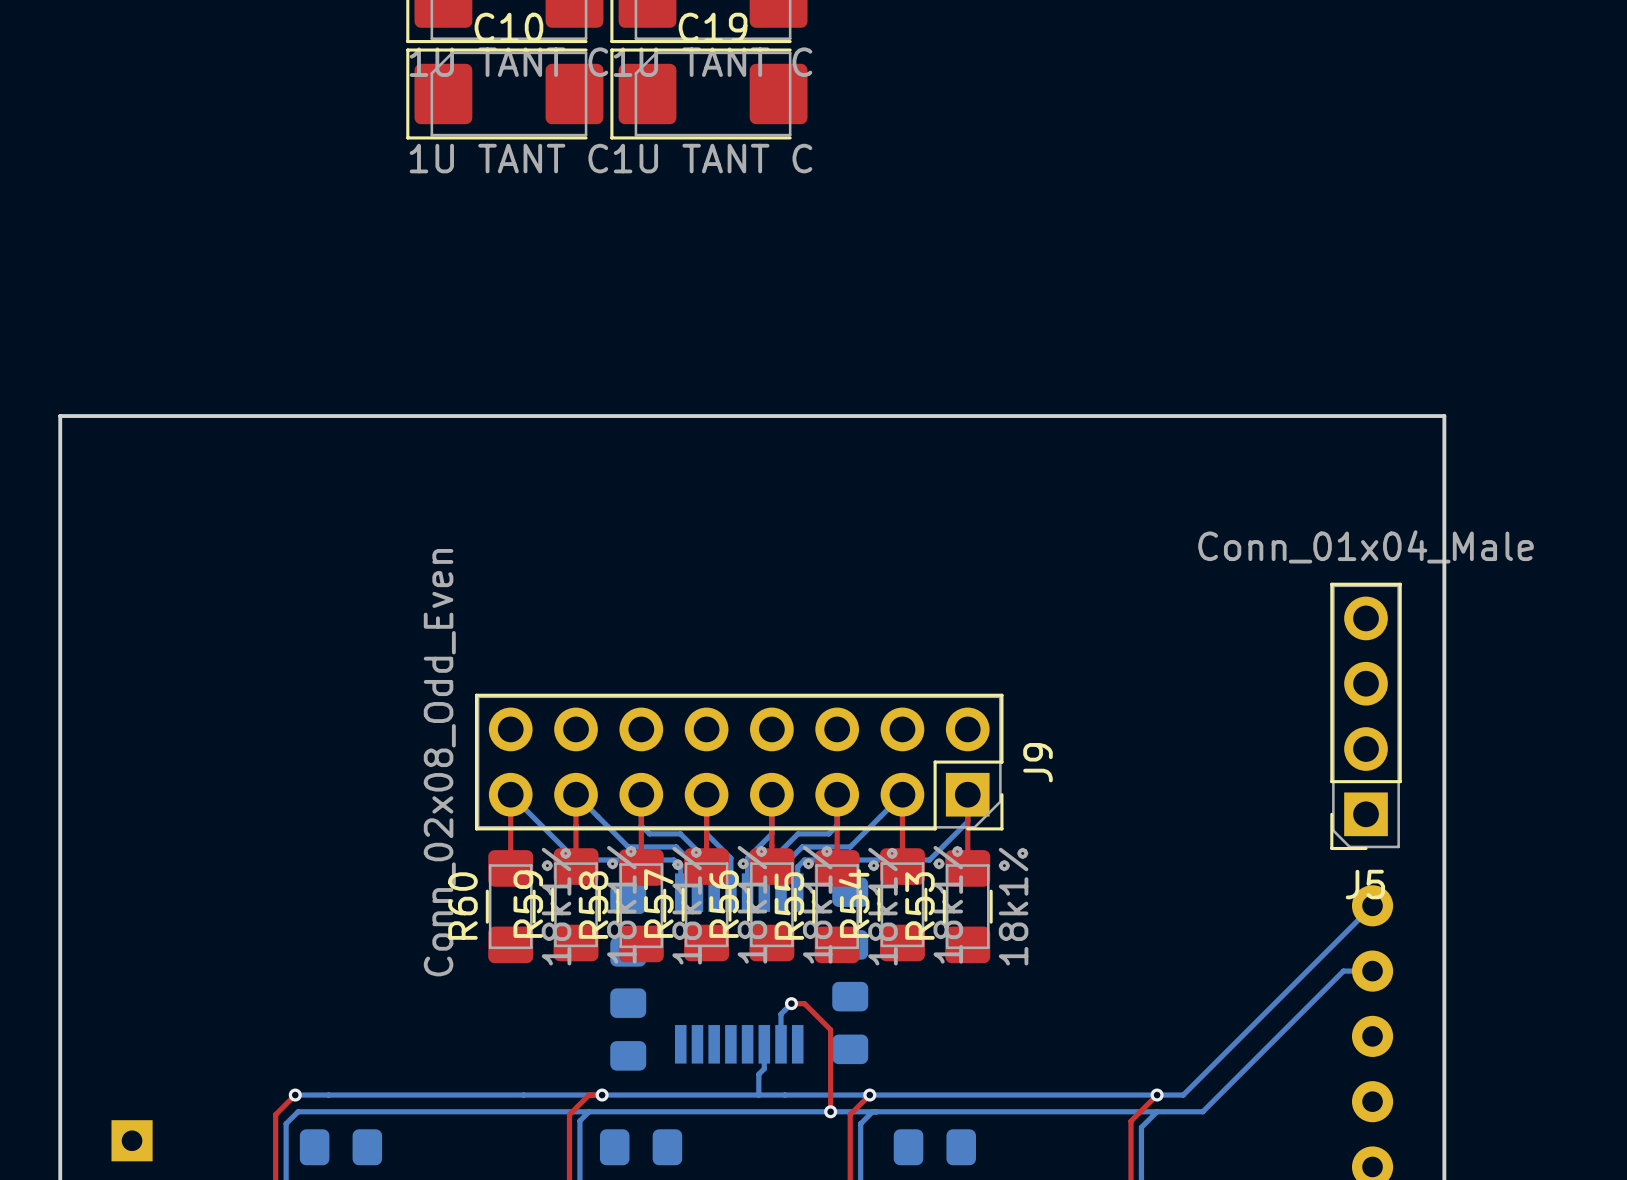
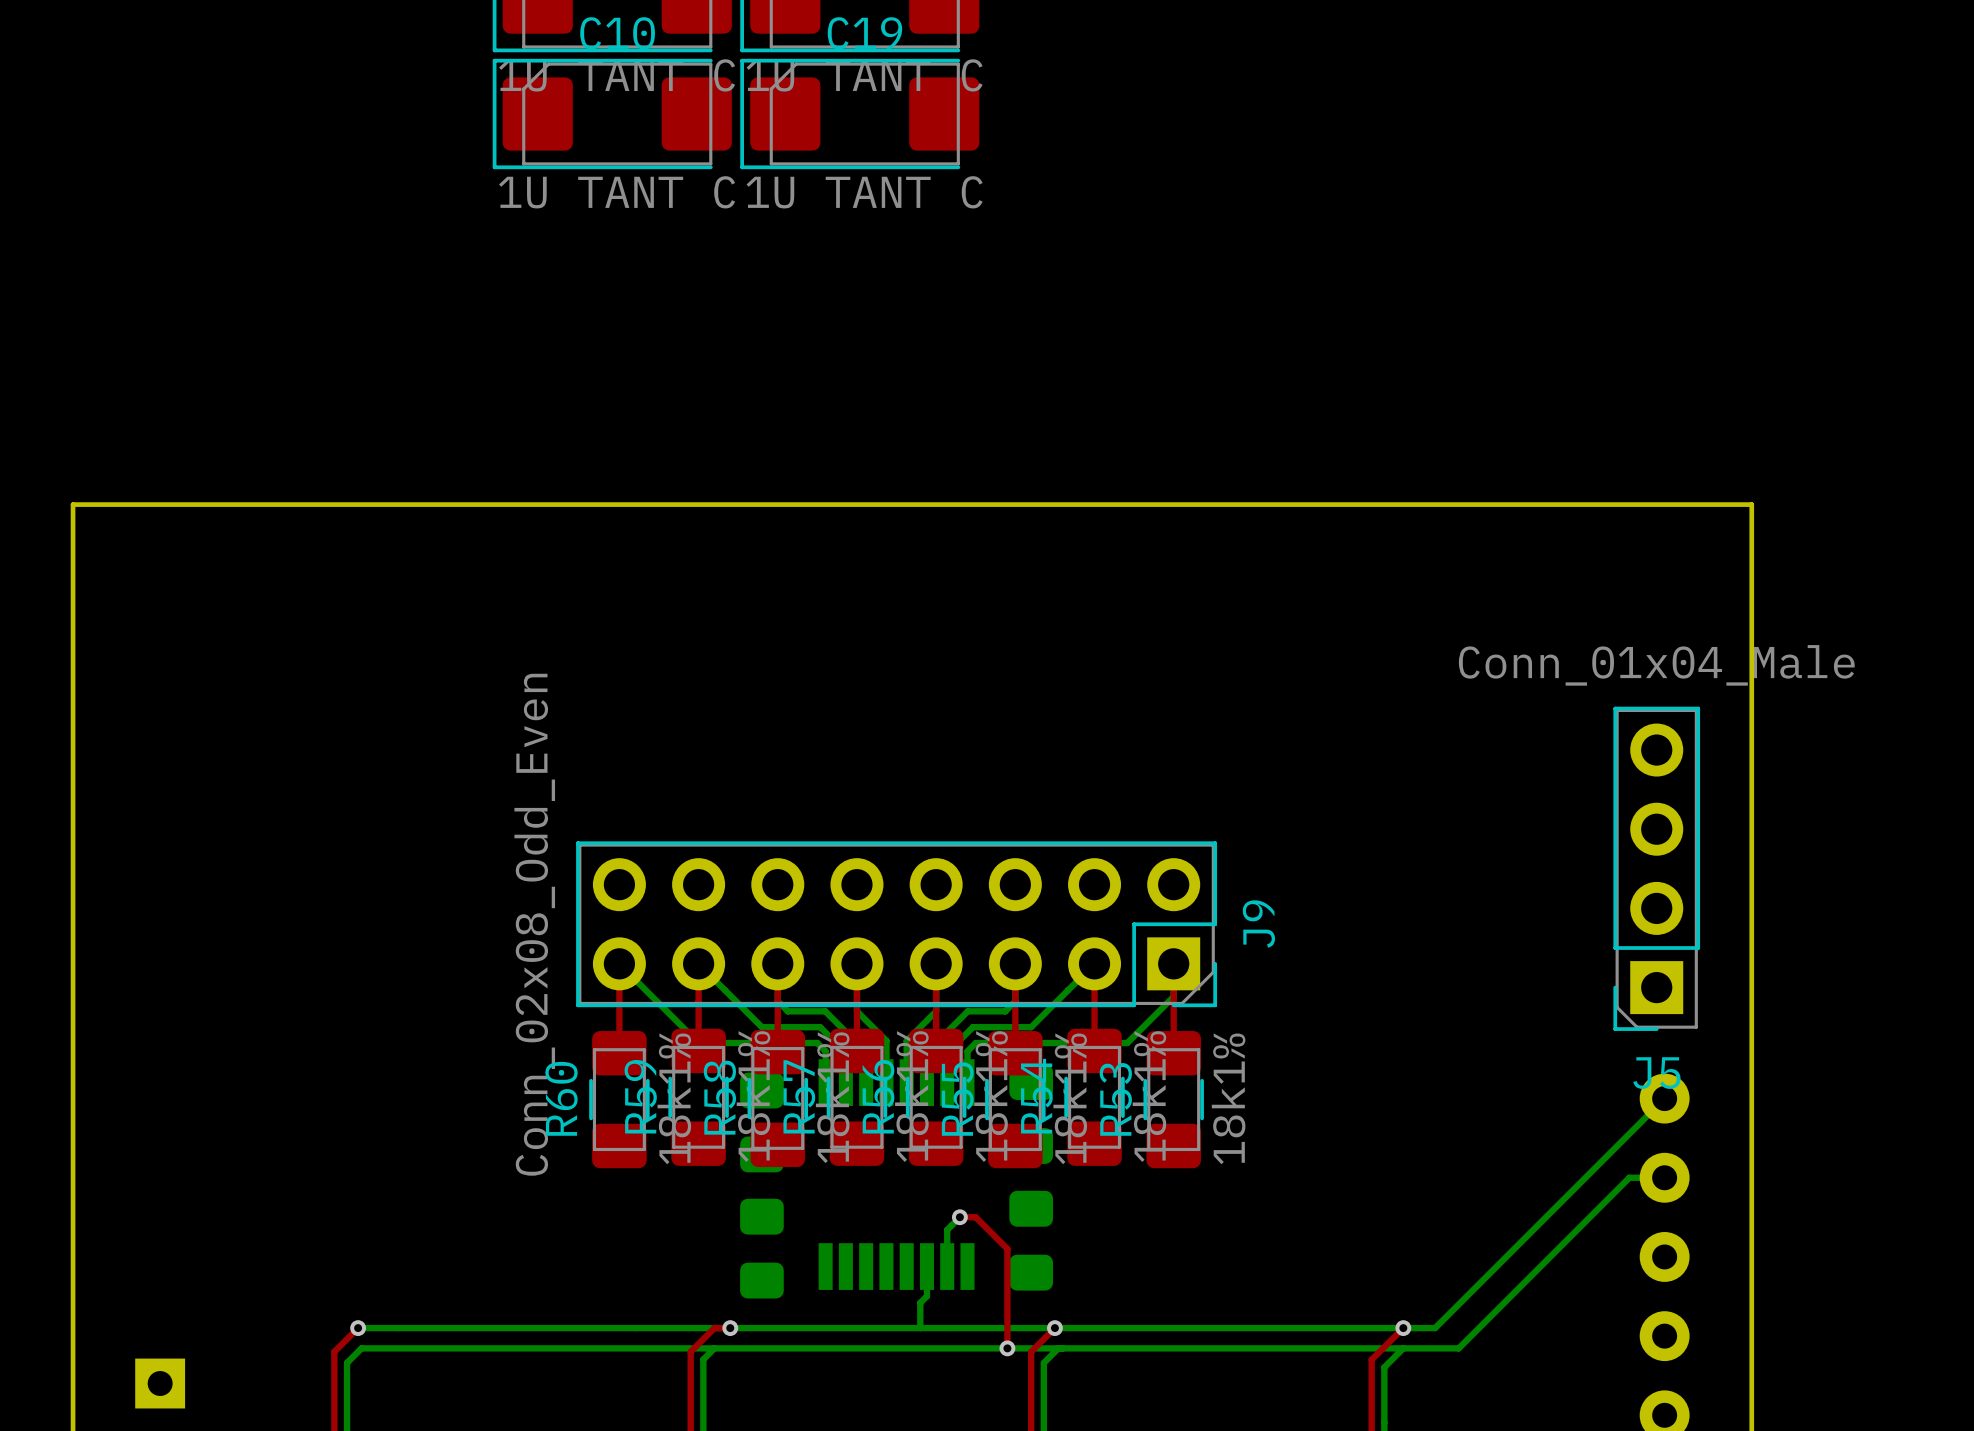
part: (340, 1147) -> none
part: (641, 1147) -> none
part: (934, 1147) -> none

